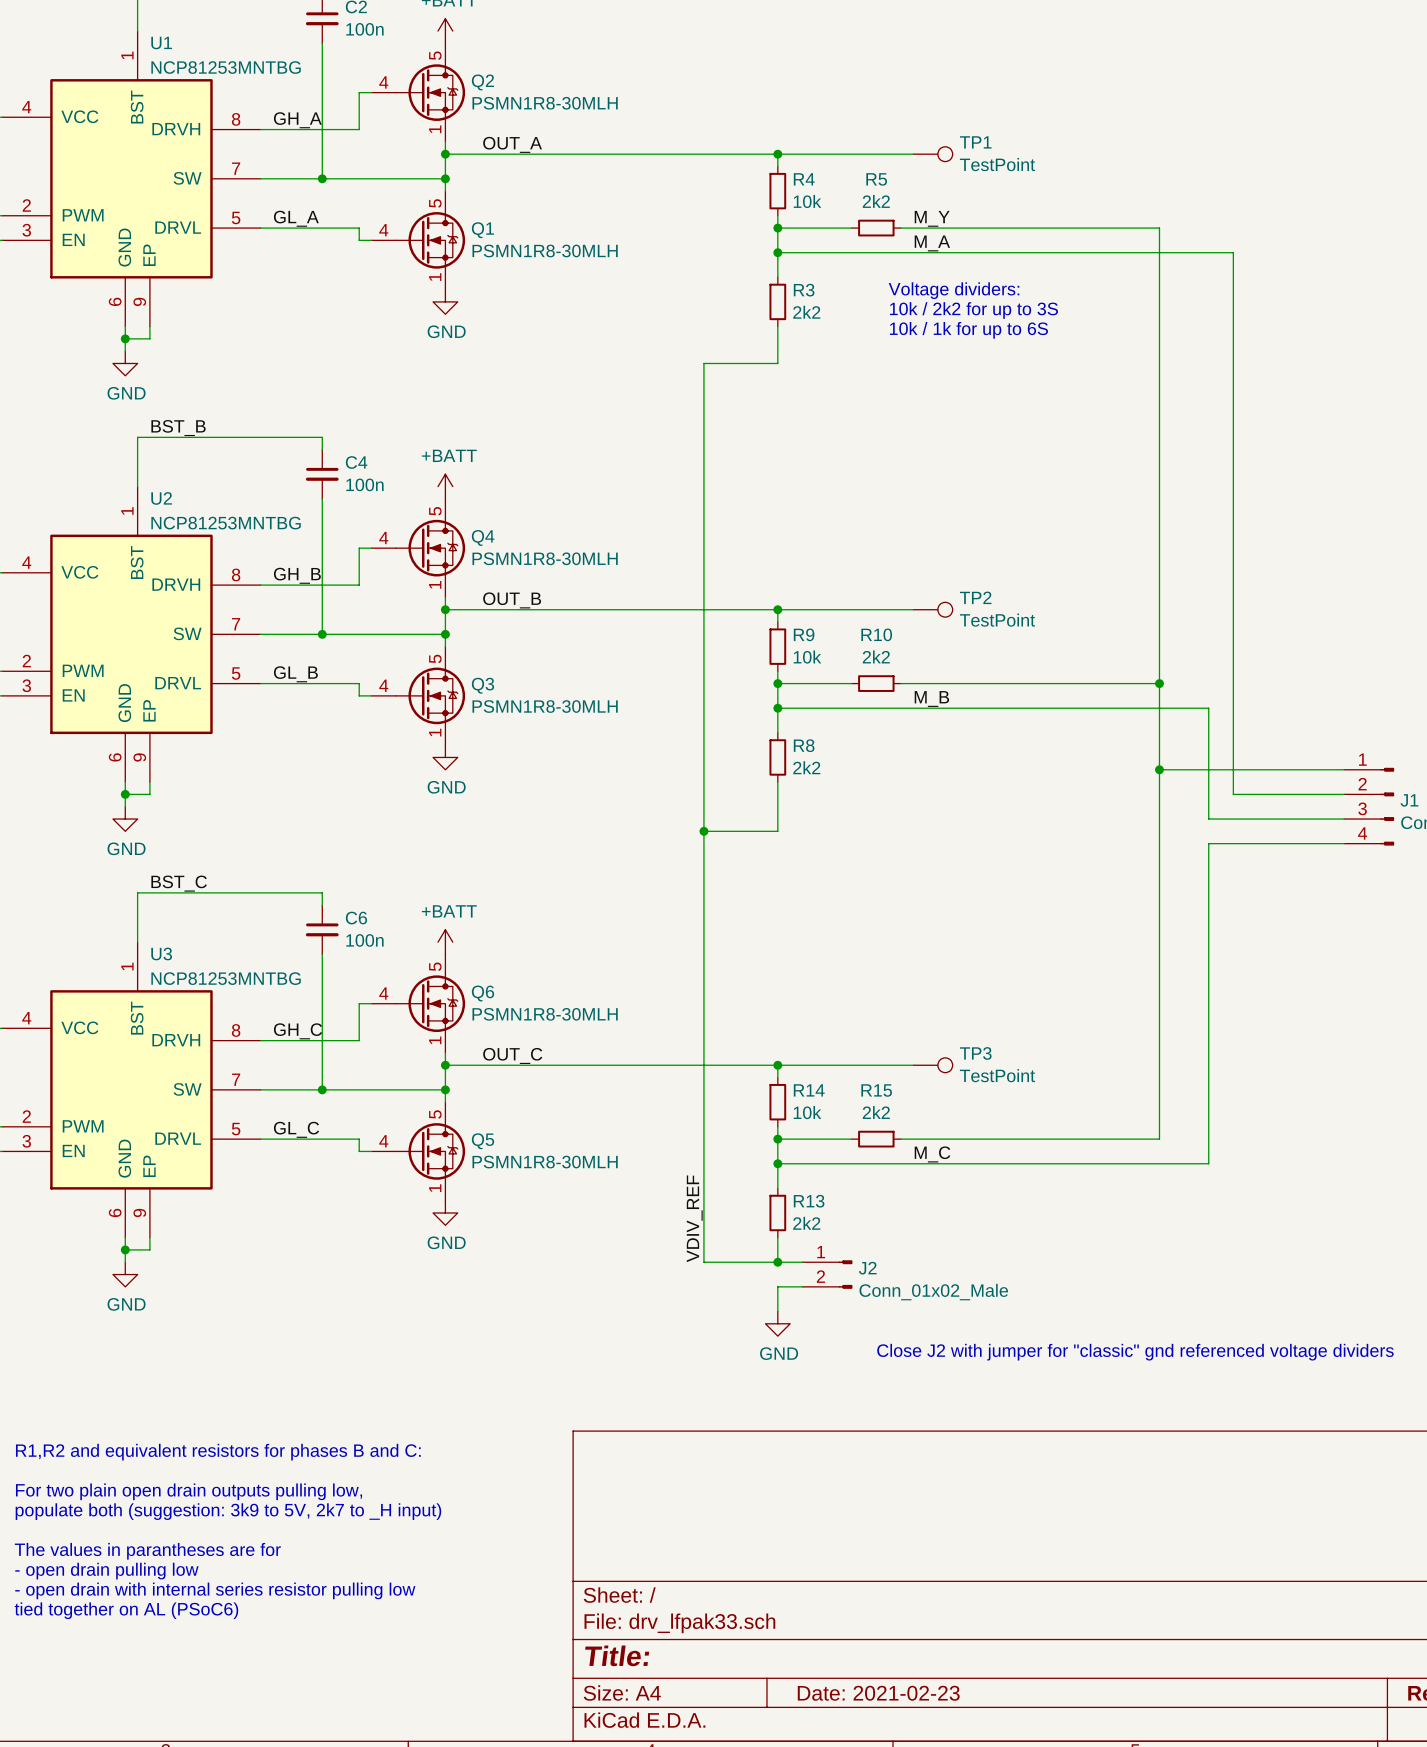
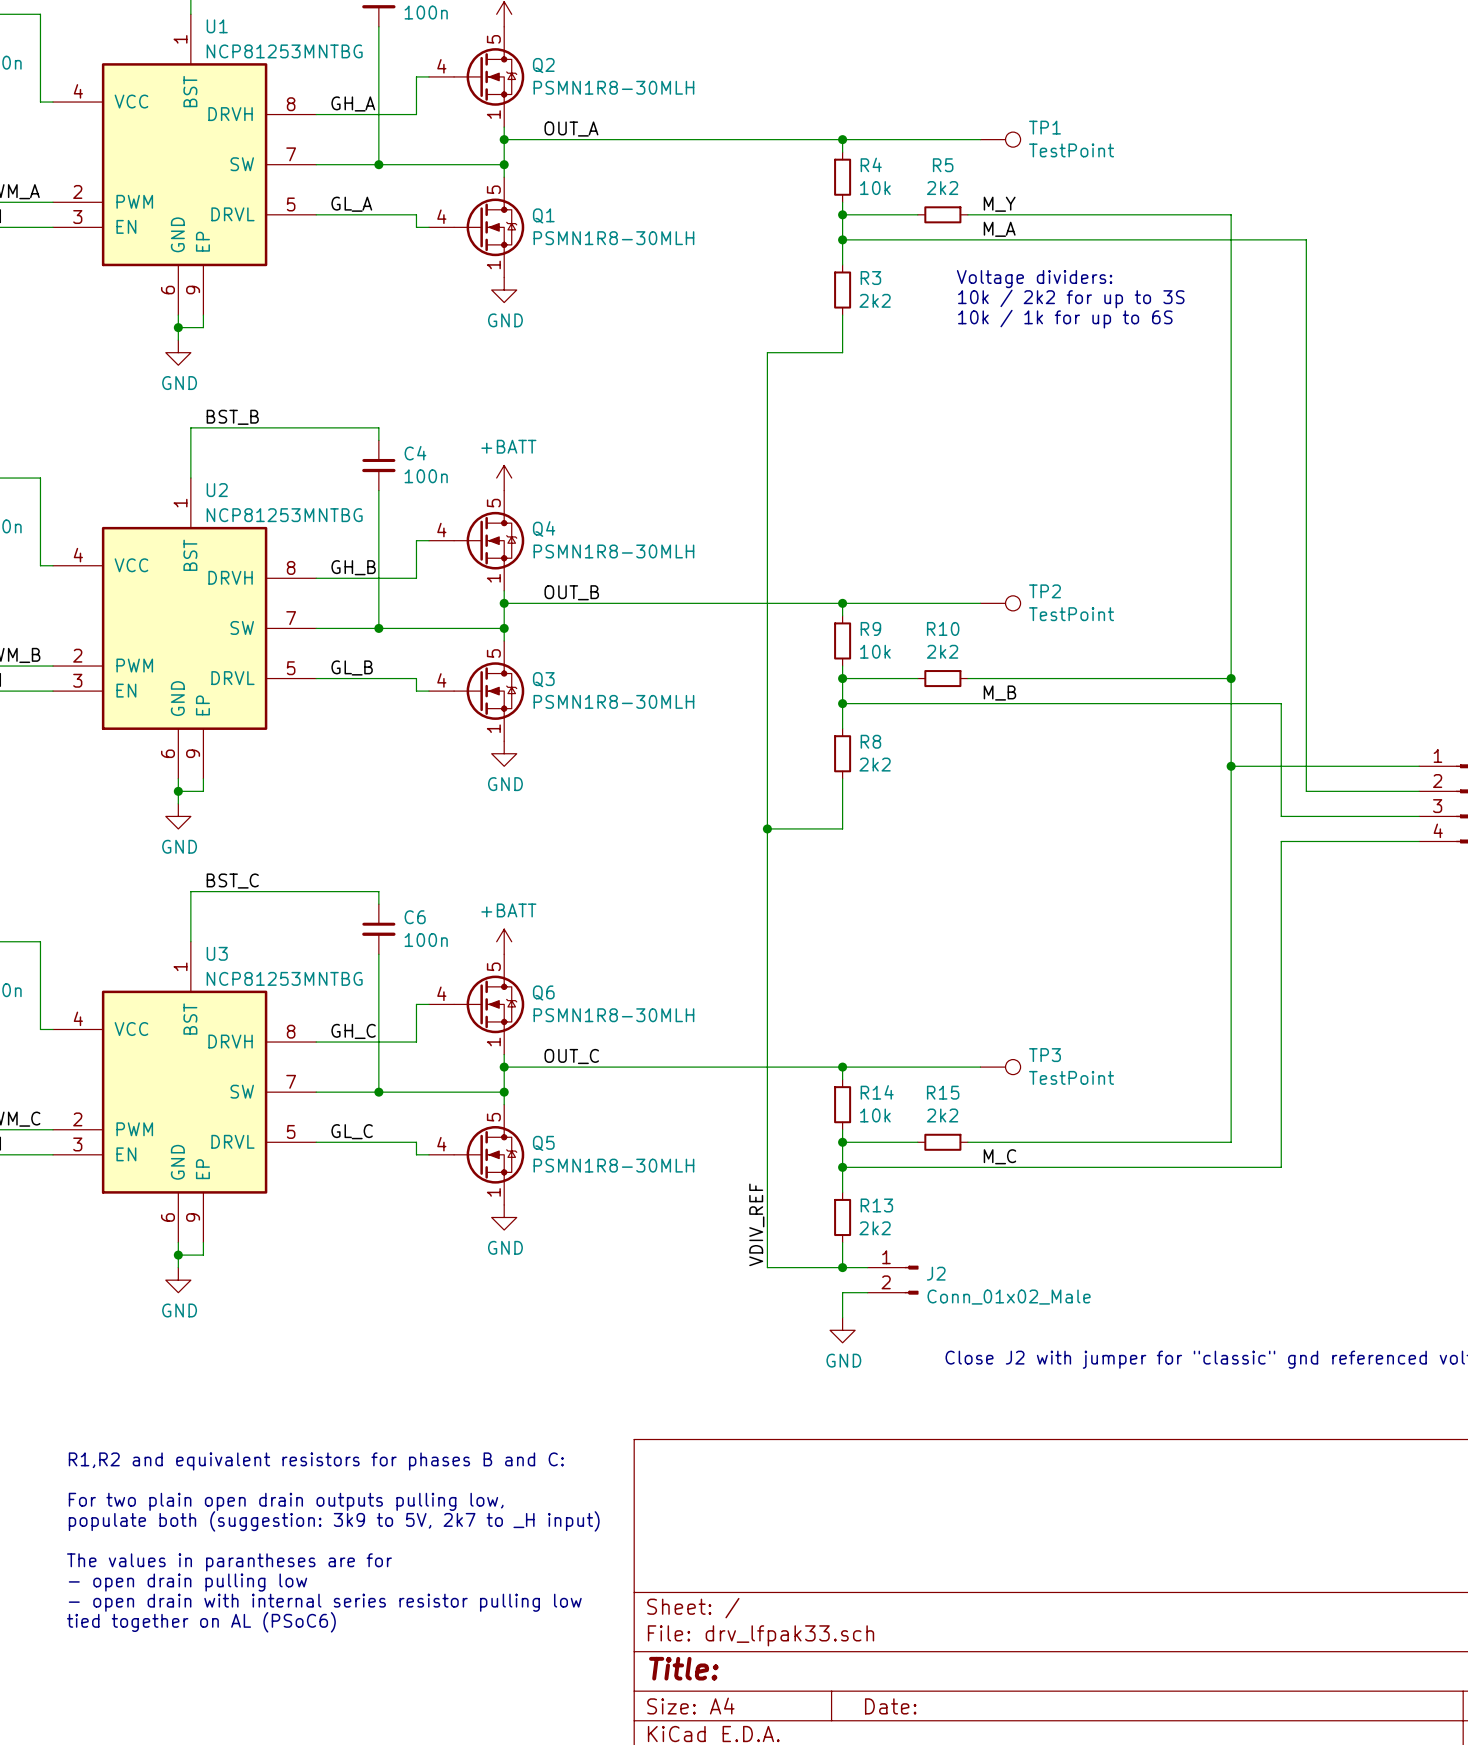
title block: Date: 2021-02-23 (878, 1693) -> Date: (890, 1706)

